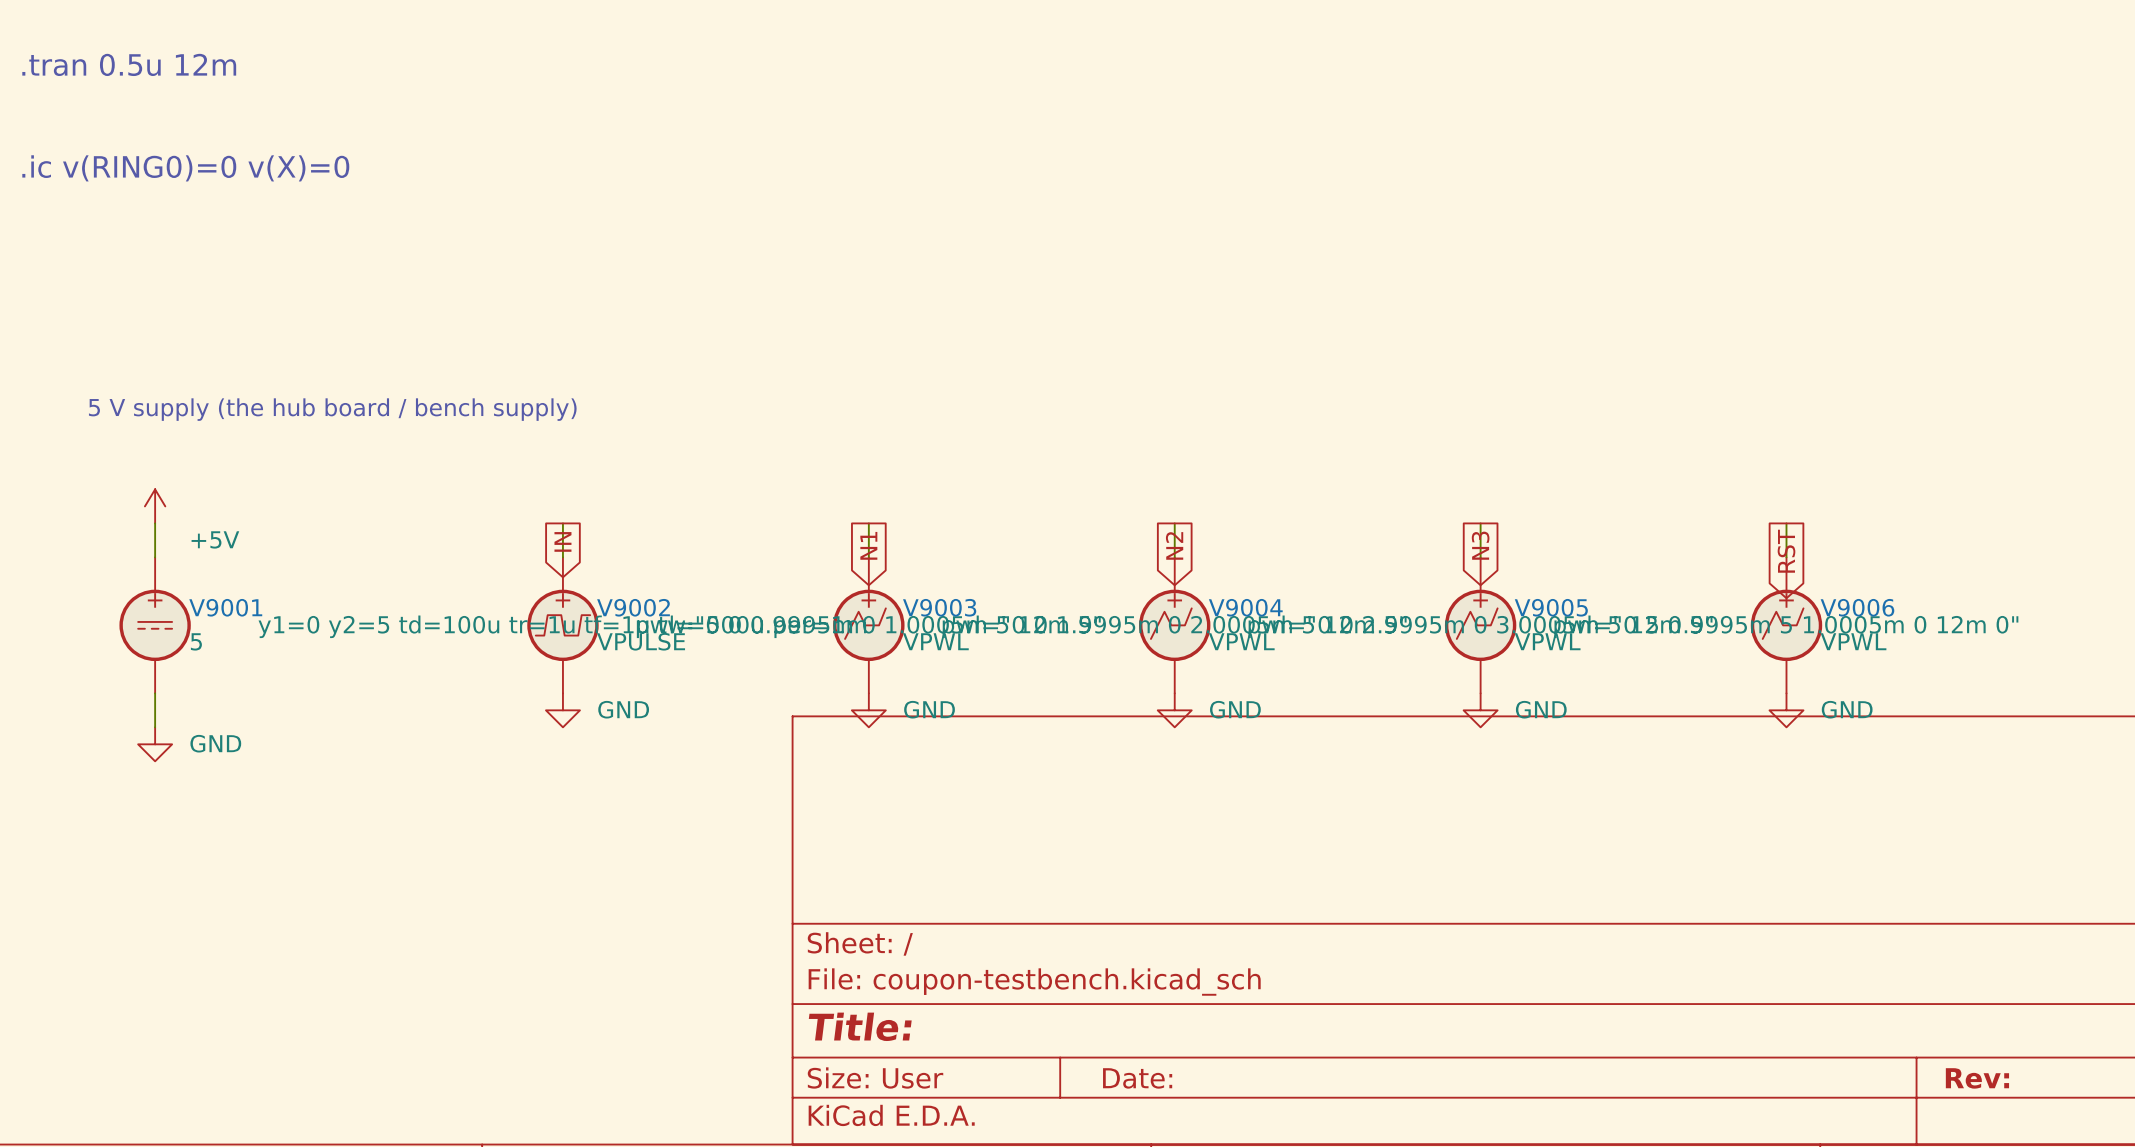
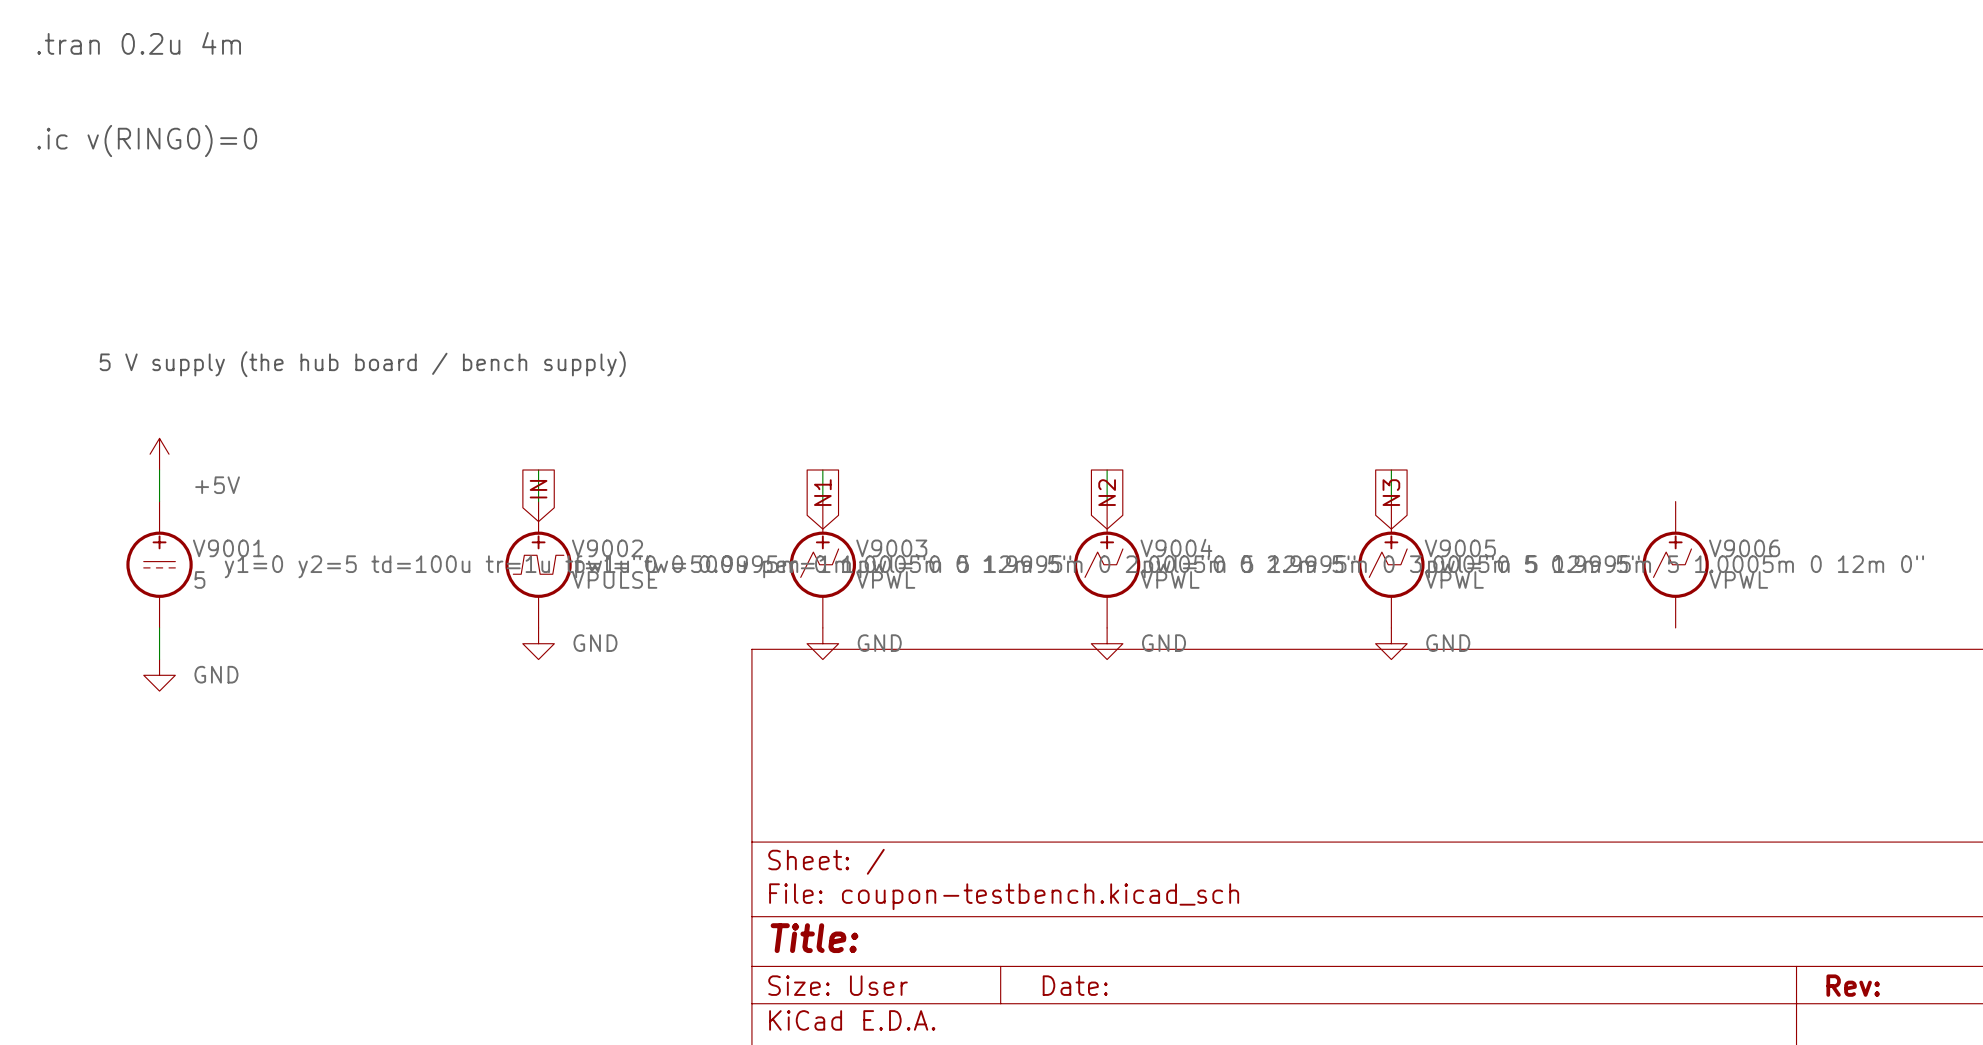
text: .tran 0.5u 12m (129, 64) -> .tran 0.2u 4m (139, 43)
text: .ic v(RING0)=0 v(X)=0 (185, 168) -> .ic v(RING0)=0 (147, 141)
wire: (1786, 523) (1786, 557) -> none
global label: RST (1786, 551) -> none
power symbol: GND (1786, 710) -> none

